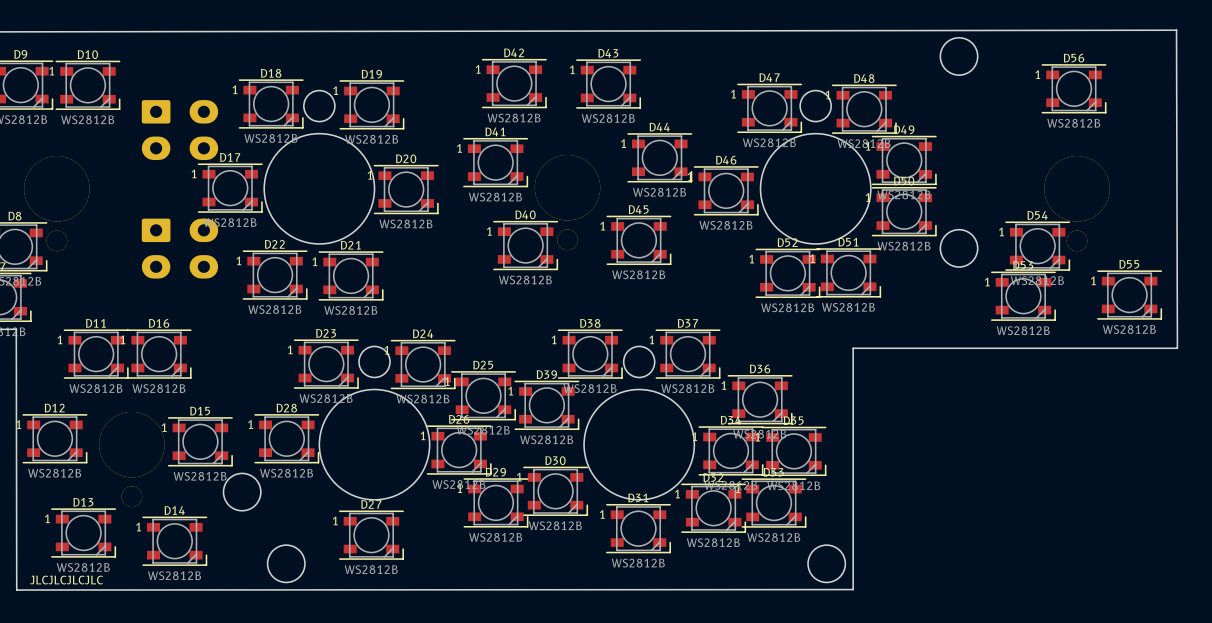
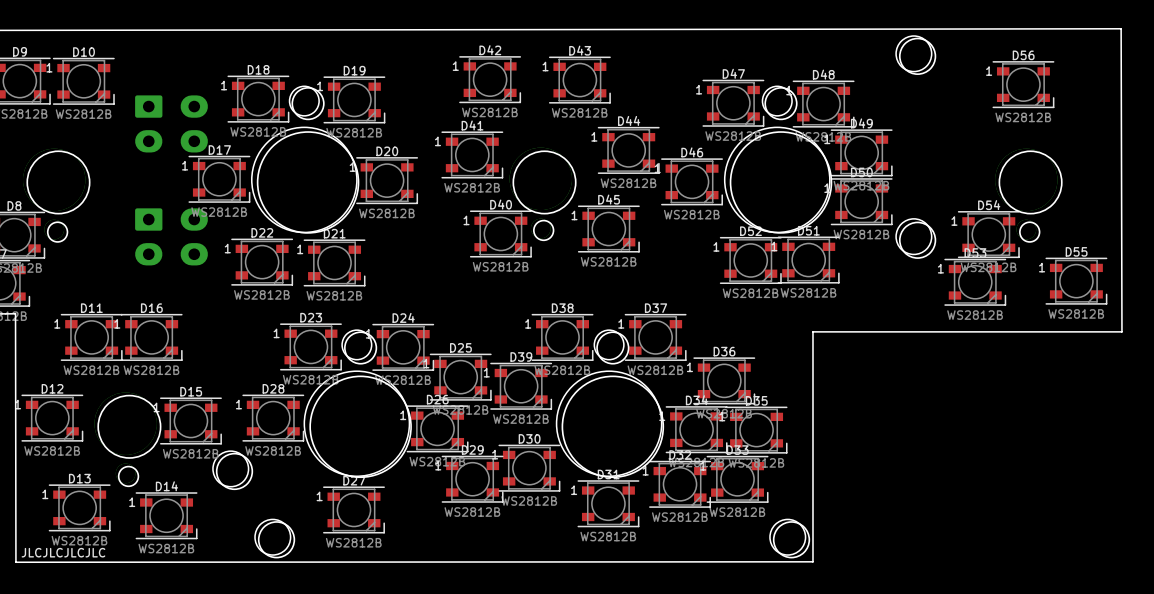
round board edge: none -> [898, 37, 937, 75]
round board edge: none -> [291, 87, 325, 121]
round board edge: none -> [764, 87, 798, 121]
round board edge: none -> [256, 131, 360, 234]
round board edge: none -> [729, 131, 833, 234]
round board edge: none -> [26, 150, 91, 215]
round board edge: none -> [512, 150, 577, 215]
round board edge: none -> [998, 150, 1063, 215]
round board edge: none -> [533, 219, 555, 242]
round board edge: none -> [46, 221, 69, 243]
round board edge: none -> [898, 221, 937, 259]
round board edge: none -> [1019, 221, 1041, 243]
round board edge: none -> [344, 331, 378, 365]
round board edge: none -> [596, 331, 630, 365]
round board edge: none -> [309, 375, 412, 479]
round board edge: none -> [561, 375, 665, 479]
round board edge: none -> [97, 394, 162, 459]
round board edge: none -> [215, 452, 254, 491]
round board edge: none -> [117, 465, 140, 488]
round board edge: none -> [257, 521, 296, 559]
round board edge: none -> [772, 521, 811, 559]

